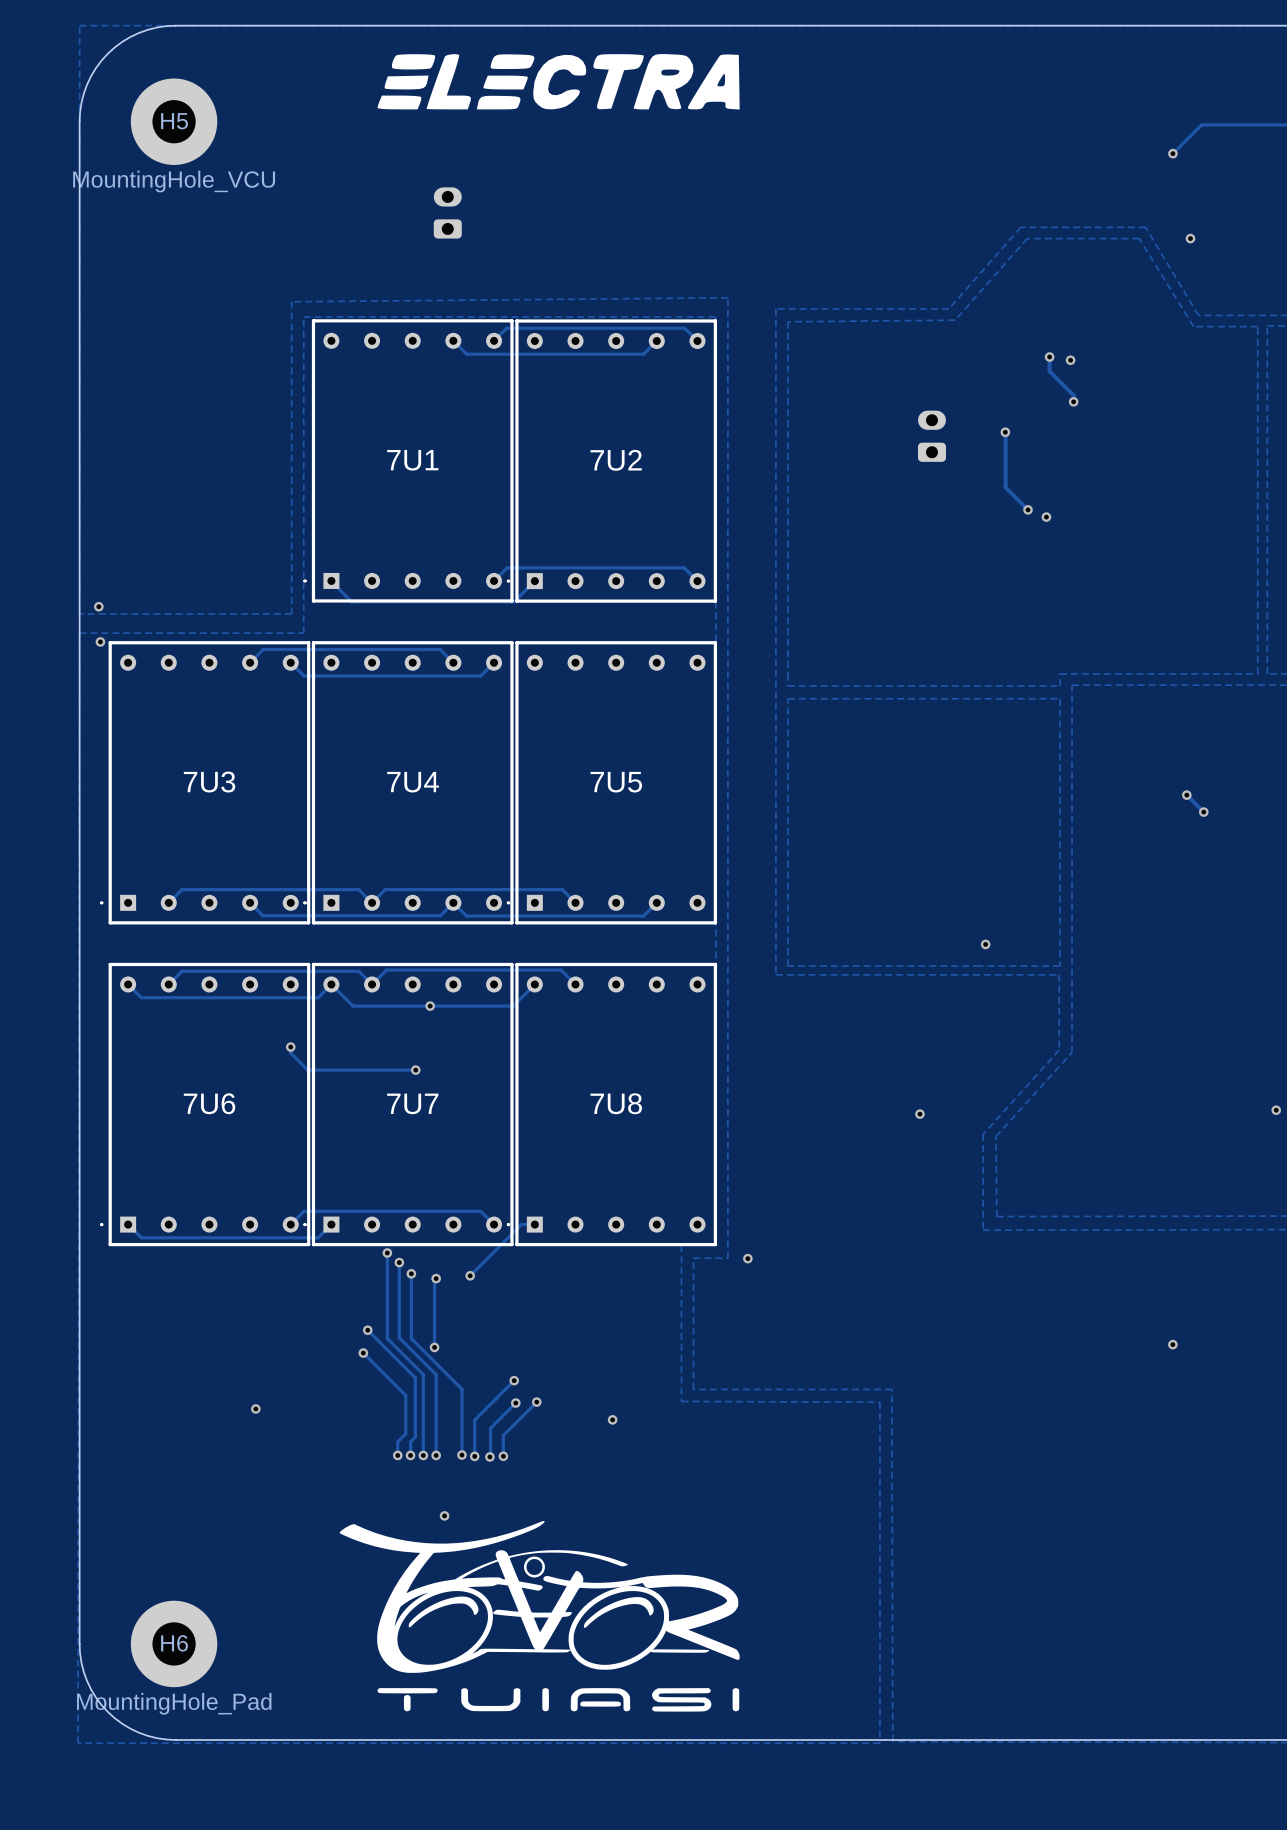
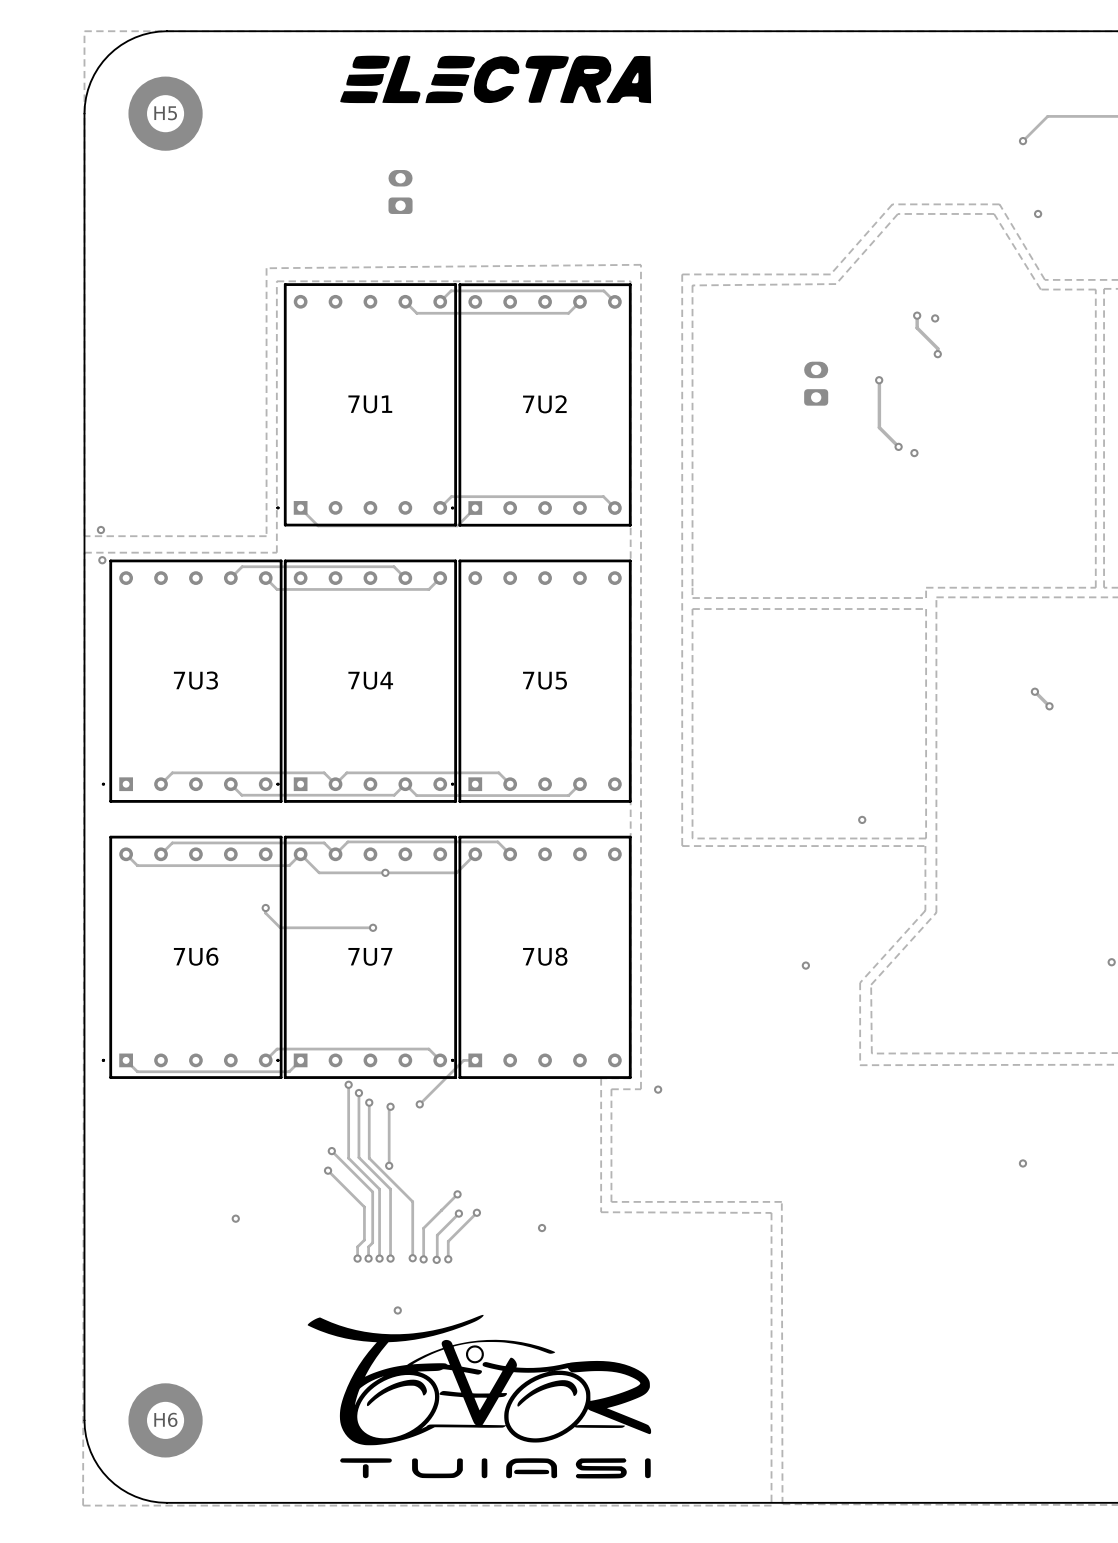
H5 value: MountingHole_VCU (174, 181) -> none
H6 value: MountingHole_Pad (174, 1703) -> none

